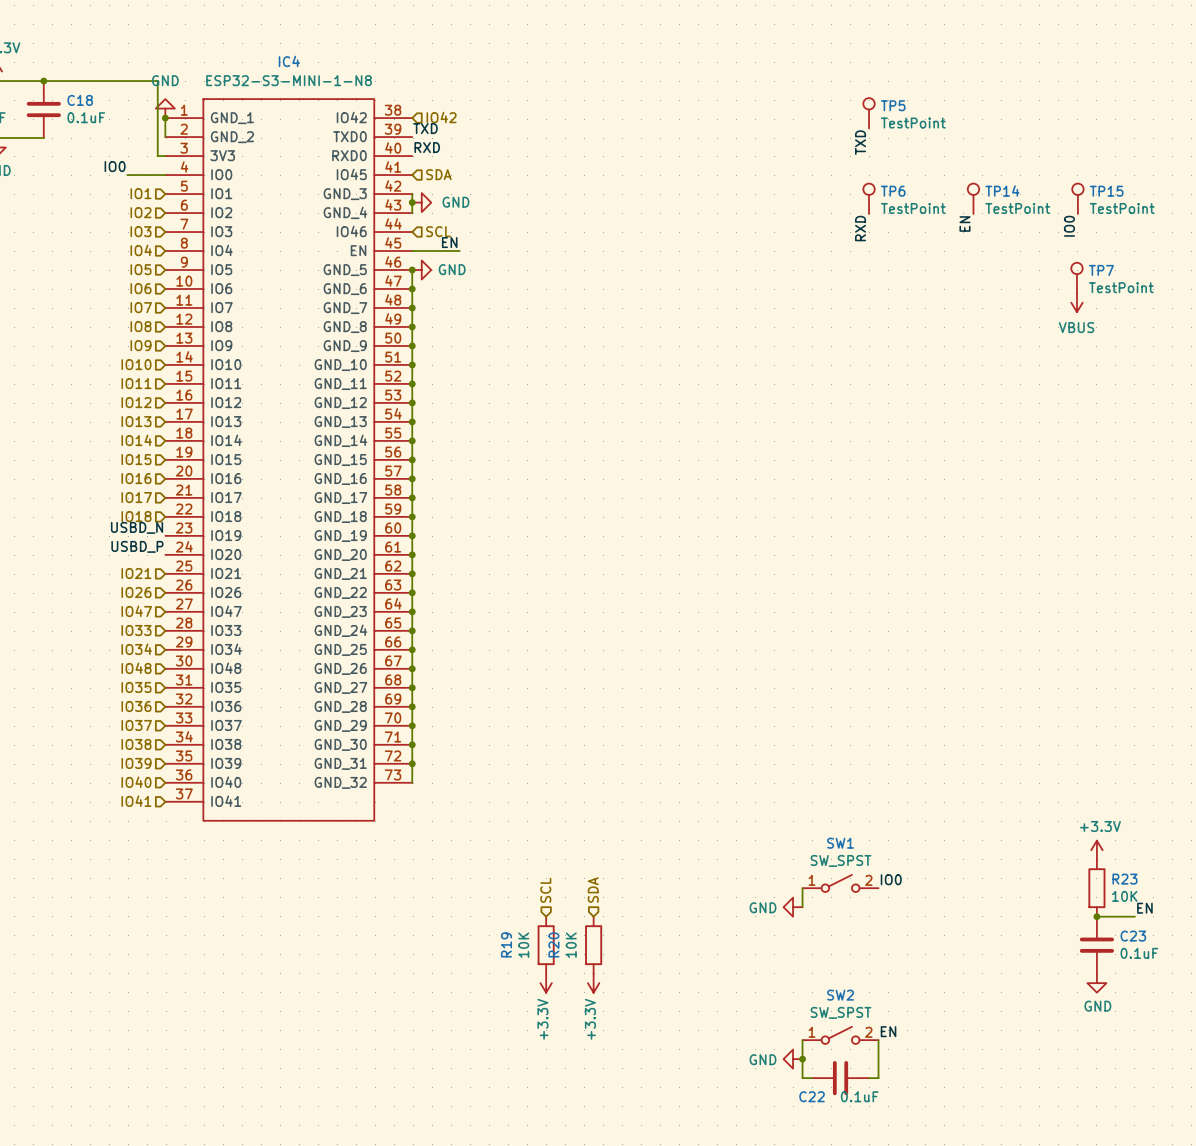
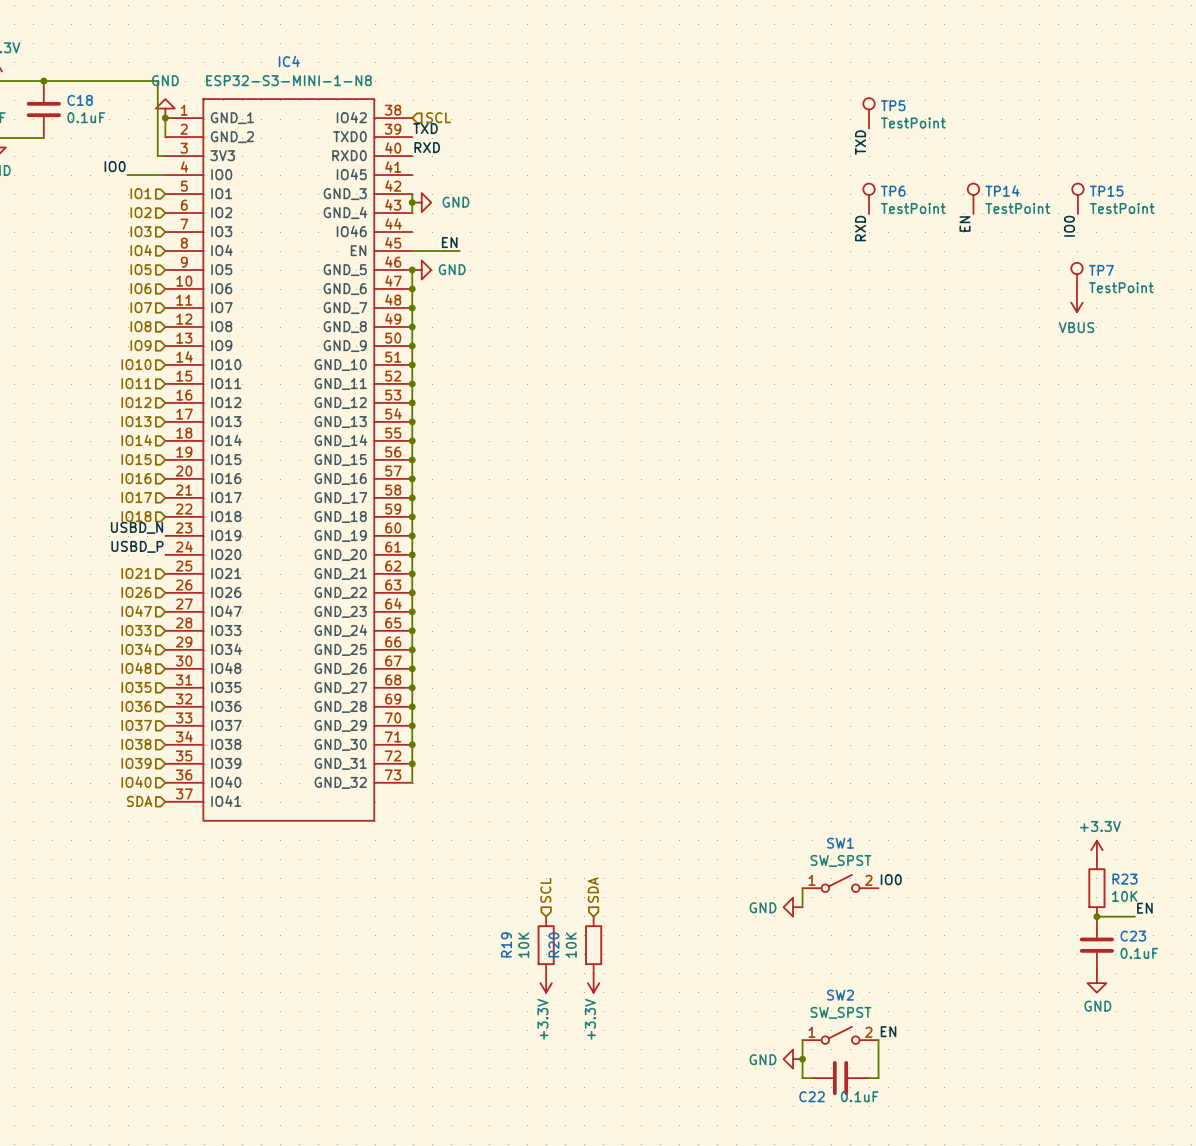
hierarchical label: IO42 (441, 117) -> SCL (438, 117)
hierarchical label: SDA (438, 174) -> none
hierarchical label: SCL (438, 231) -> none
hierarchical label: IO41 (136, 801) -> SDA (139, 801)

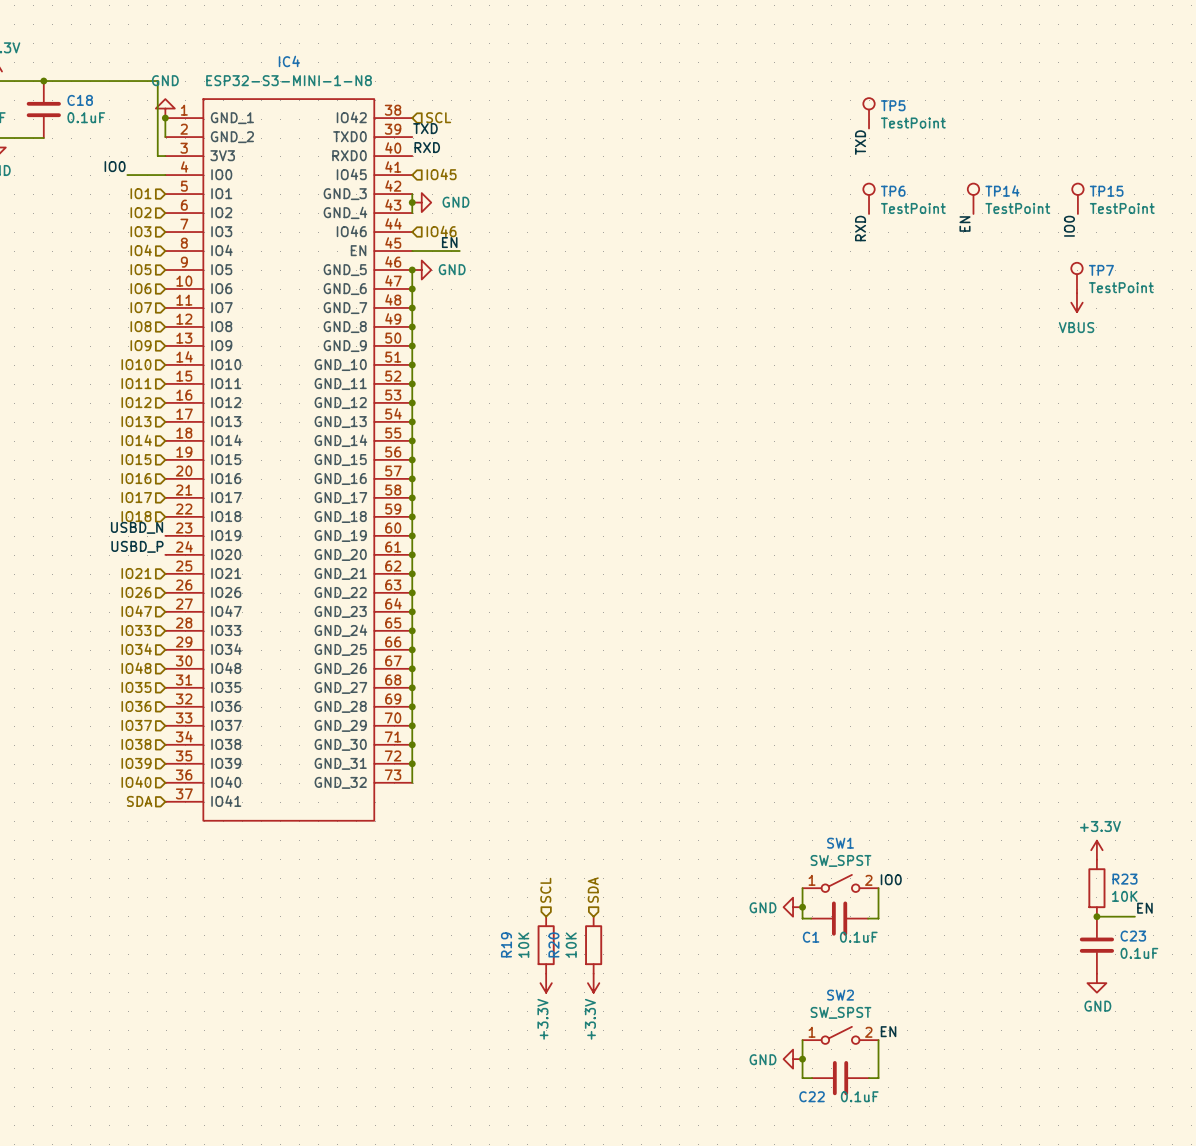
hierarchical label: none -> IO45 (441, 174)
hierarchical label: none -> IO46 (441, 231)
wire: none -> (878, 888) (878, 918) (868, 918)
wire: none -> (802, 907) (802, 918) (811, 918)
junction: none -> (802, 907)
C1: none -> 0.1uF (839, 918)

